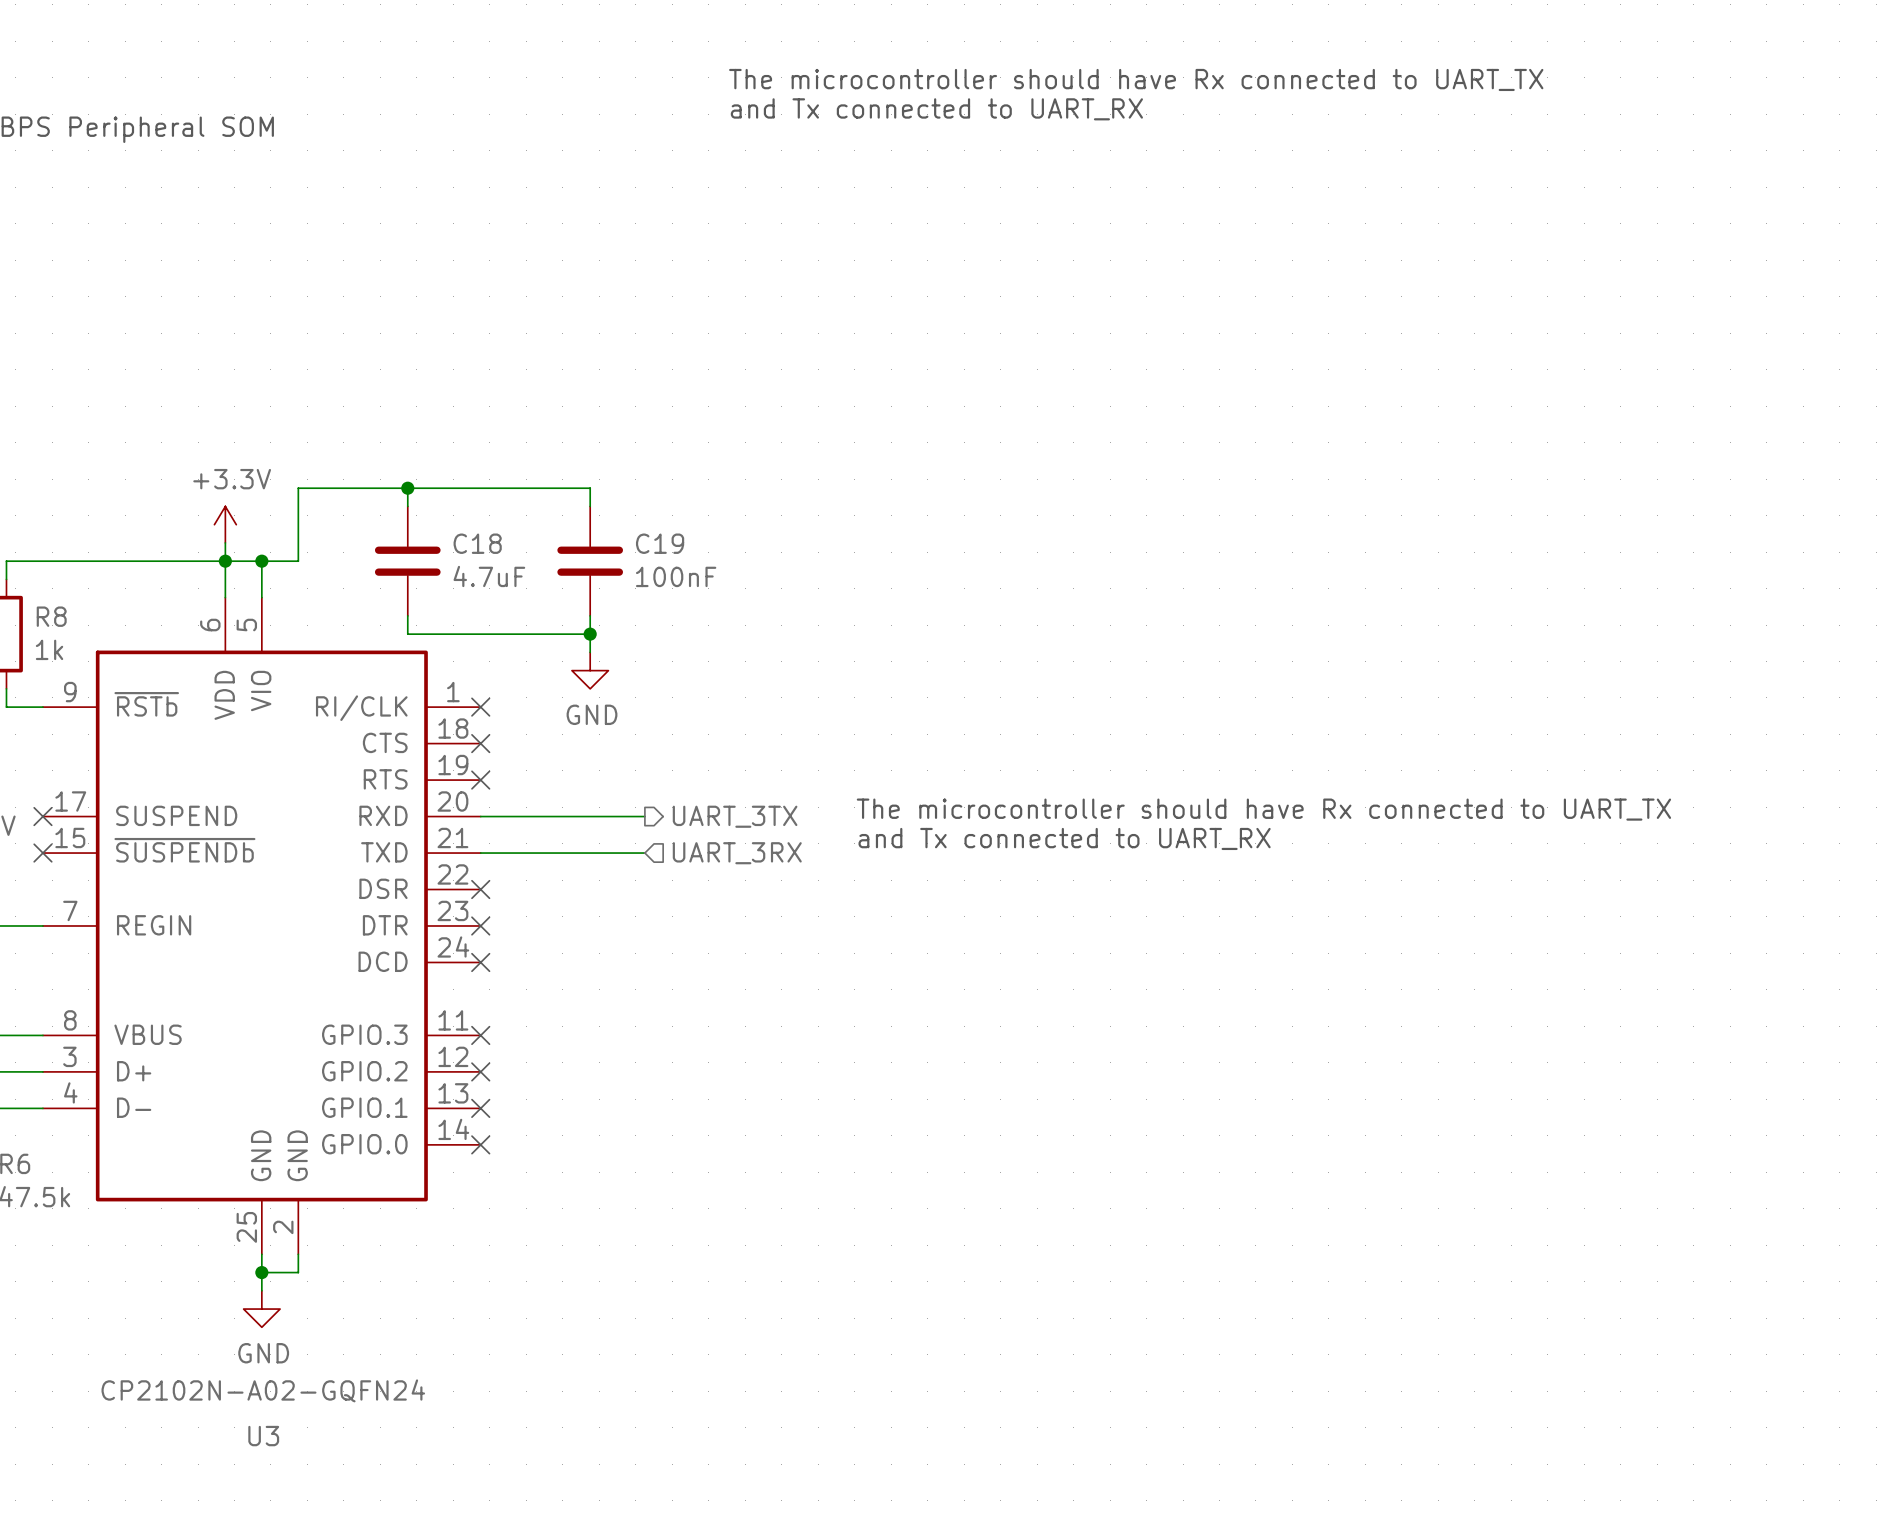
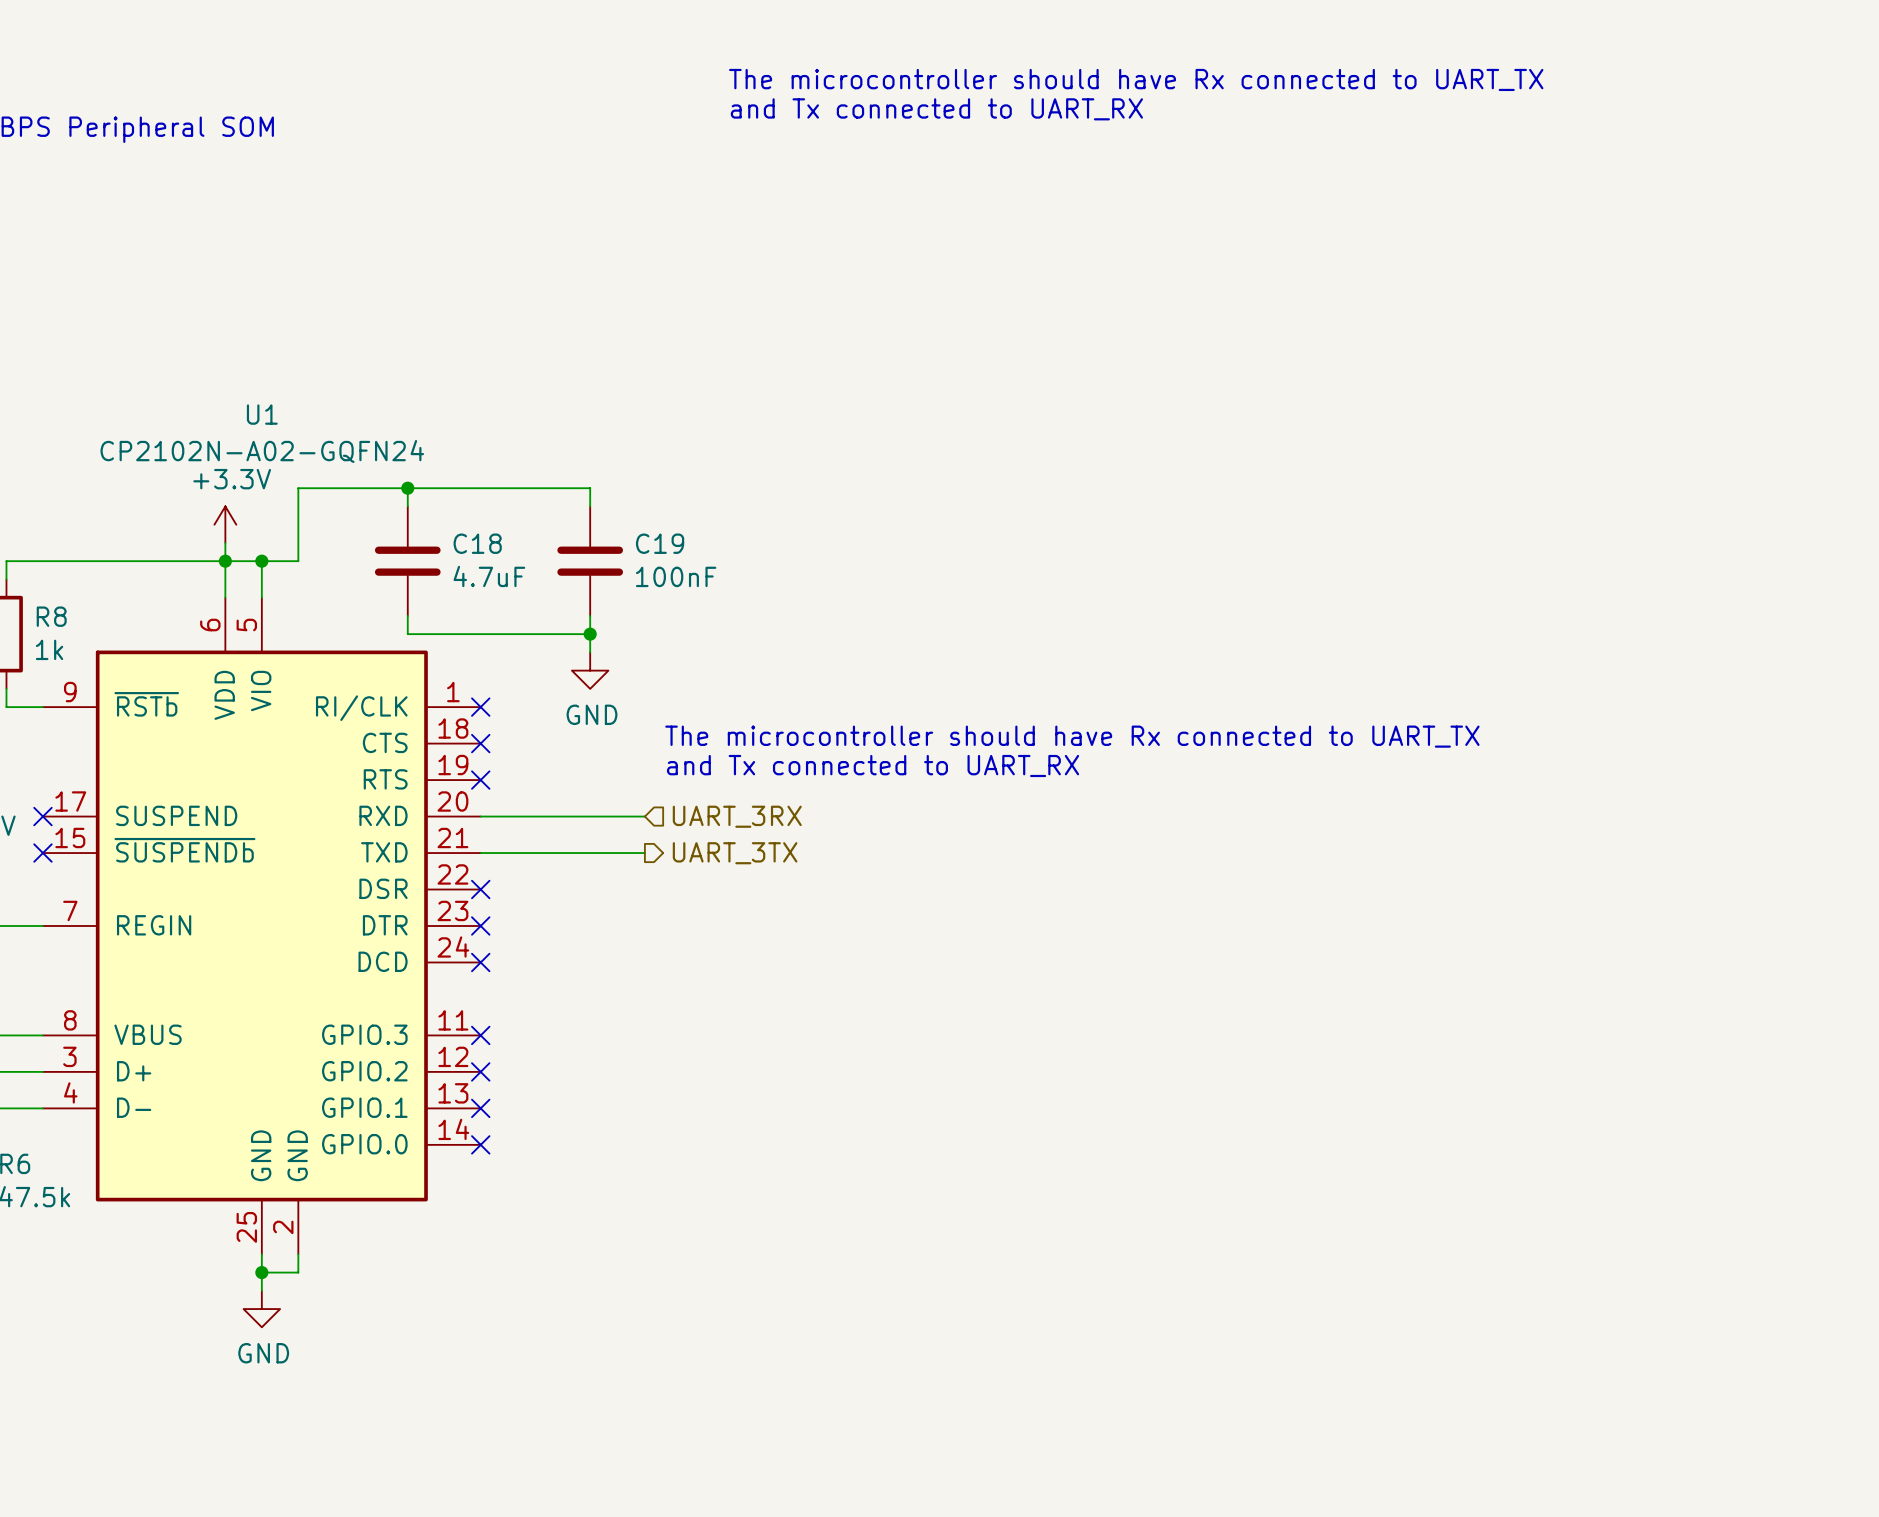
text position: The microcontroller should have Rx connected to UART_TX (1263, 809) -> The microcontroller should have Rx connected to UART_TX (1072, 736)
hierarchical label shape: output (735, 816) -> input (737, 816)
hierarchical label: UART_3TX (735, 816) -> UART_3RX (737, 816)
text position: and Tx connected to UART_RX (1064, 838) -> and Tx connected to UART_RX (873, 765)
hierarchical label shape: input (737, 853) -> output (735, 853)
hierarchical label: UART_3RX (737, 853) -> UART_3TX (735, 853)
U3 value position: CP2102N-A02-GQFN24 (263, 1390) -> CP2102N-A02-GQFN24 (262, 451)
U3 name: U3 (263, 1436) -> U1 (262, 414)

